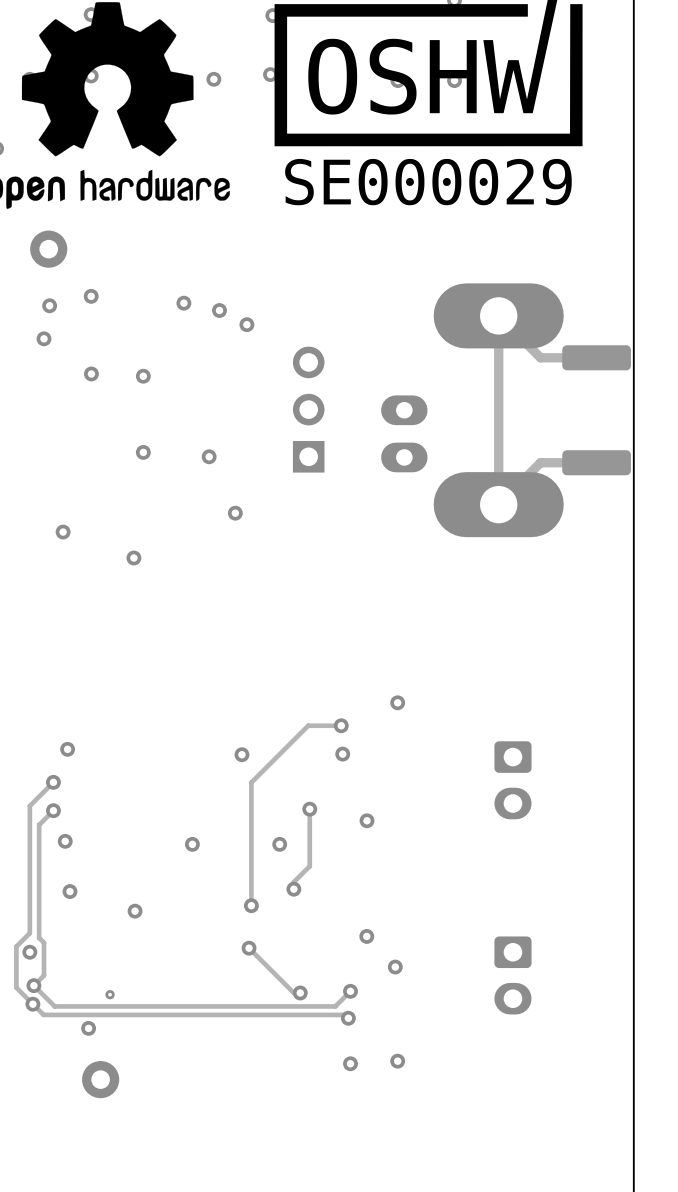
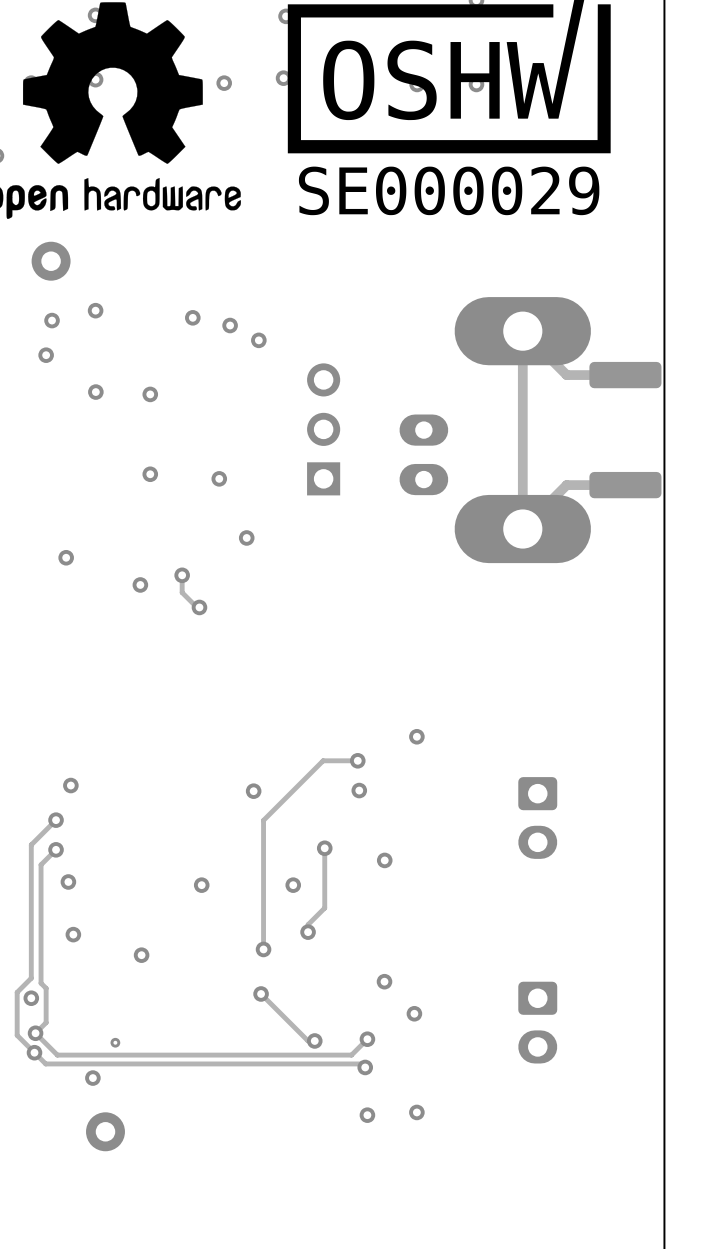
track: none -> (182, 575) (182, 592) (197, 607) (199, 607)
via: none -> (182, 575)
via: none -> (199, 607)

